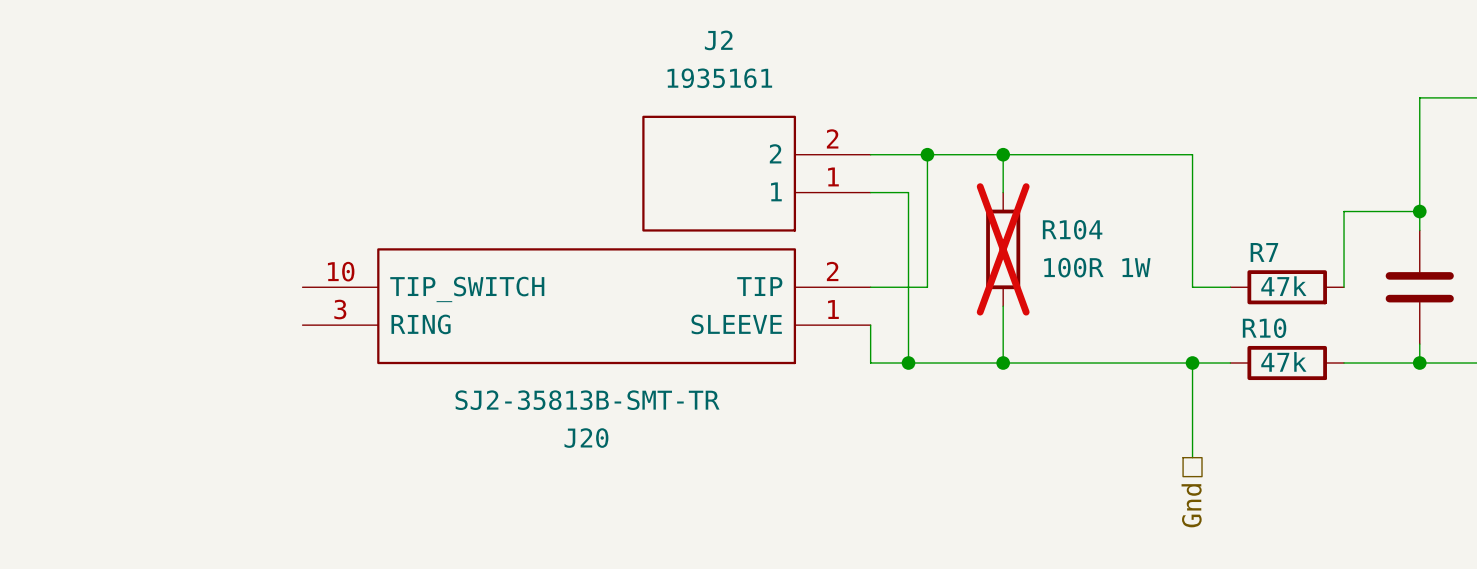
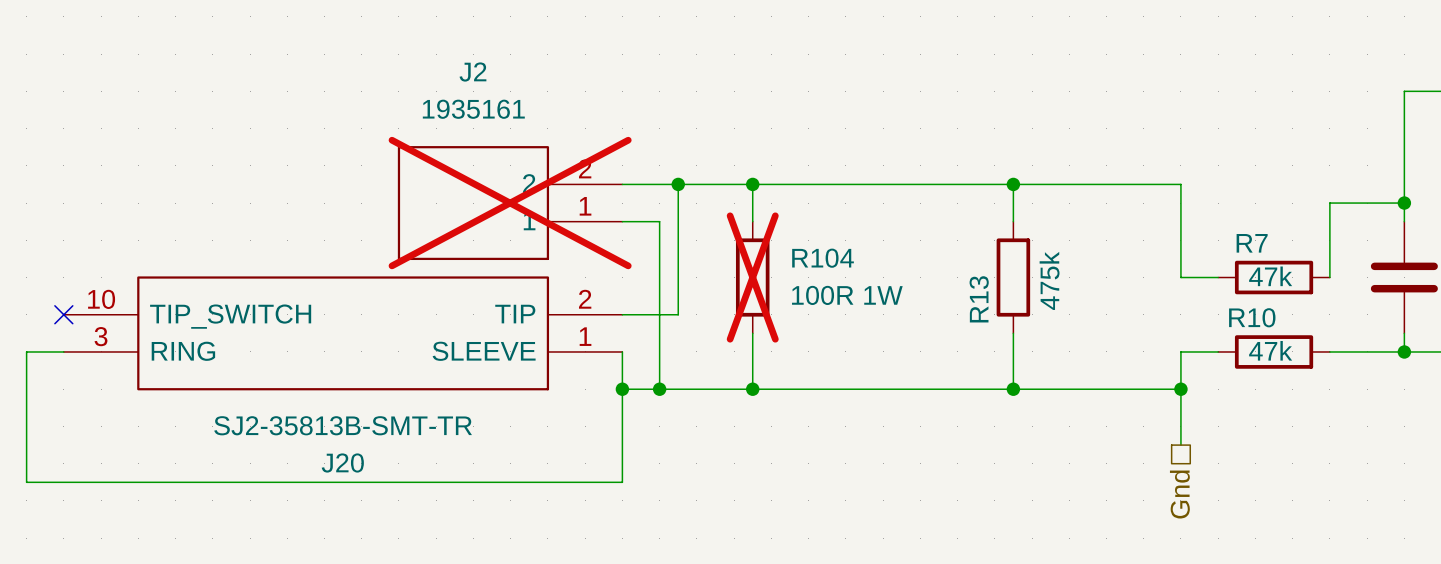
wire: (870, 154) (1192, 154) (1192, 192) -> (901, 184) (1180, 184)
wire: (927, 154) (927, 287) (870, 287) -> (678, 184) (678, 314) (622, 314)
junction: (927, 154) -> none
wire: (1003, 154) (1003, 192) -> (752, 184) (752, 221)
junction position: (1003, 154) -> (1013, 184)
J2 position: (756, 173) -> (510, 203)
wire: none -> (622, 184) (864, 184)
junction: none -> (678, 184)
junction: none -> (752, 184)
wire: (908, 192) (908, 363) -> none
wire: none -> (1013, 184) (1013, 221)
J2 do-not-place cross: none -> (510, 203)
wire: none -> (622, 221) (659, 221) (659, 389)
R104 position: (1003, 249) -> (752, 277)
R13: none -> 475k (1013, 277)
J20 position: (586, 306) -> (343, 333)
wire: (1003, 306) (1003, 363) -> (752, 333) (752, 389)
no-connect mark: none -> (63, 314)
wire: (870, 325) (870, 363) (1192, 363) -> none
wire: none -> (1013, 333) (1013, 389)
wire: none -> (63, 351) (26, 351) (26, 482) (622, 482) (622, 351)
junction: (908, 363) -> none
junction position: (1003, 363) -> (1013, 389)
junction position: (1192, 363) -> (1180, 389)
wire: none -> (622, 389) (1180, 389)
junction: none -> (622, 389)
junction: none -> (659, 389)
junction: none -> (752, 389)

